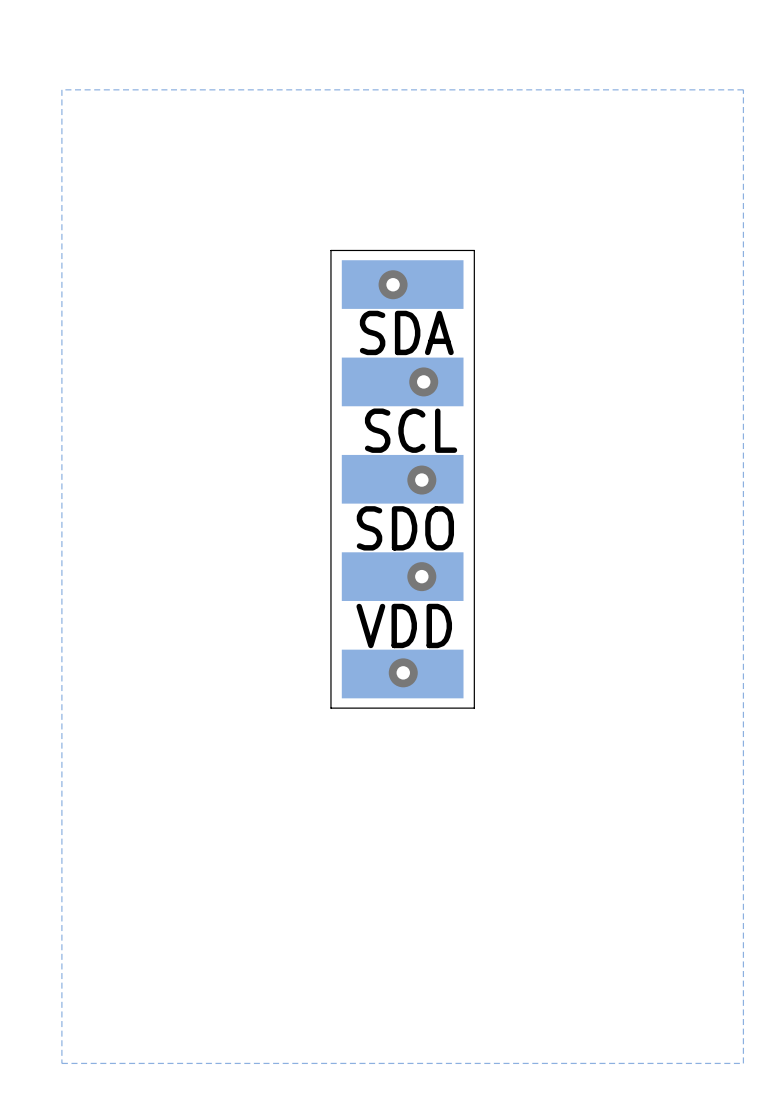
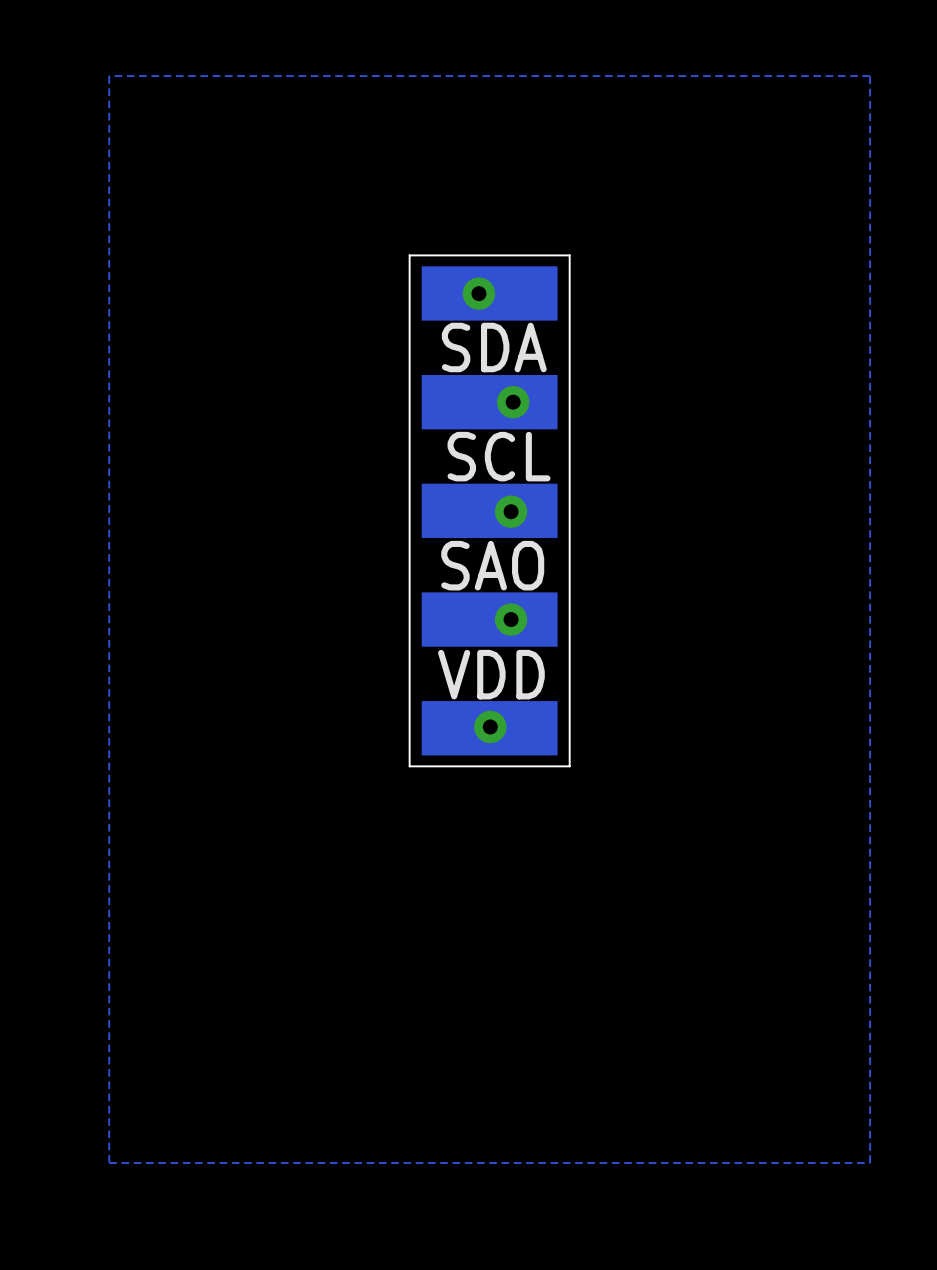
text: SDO (405, 528) -> SAO (492, 565)

